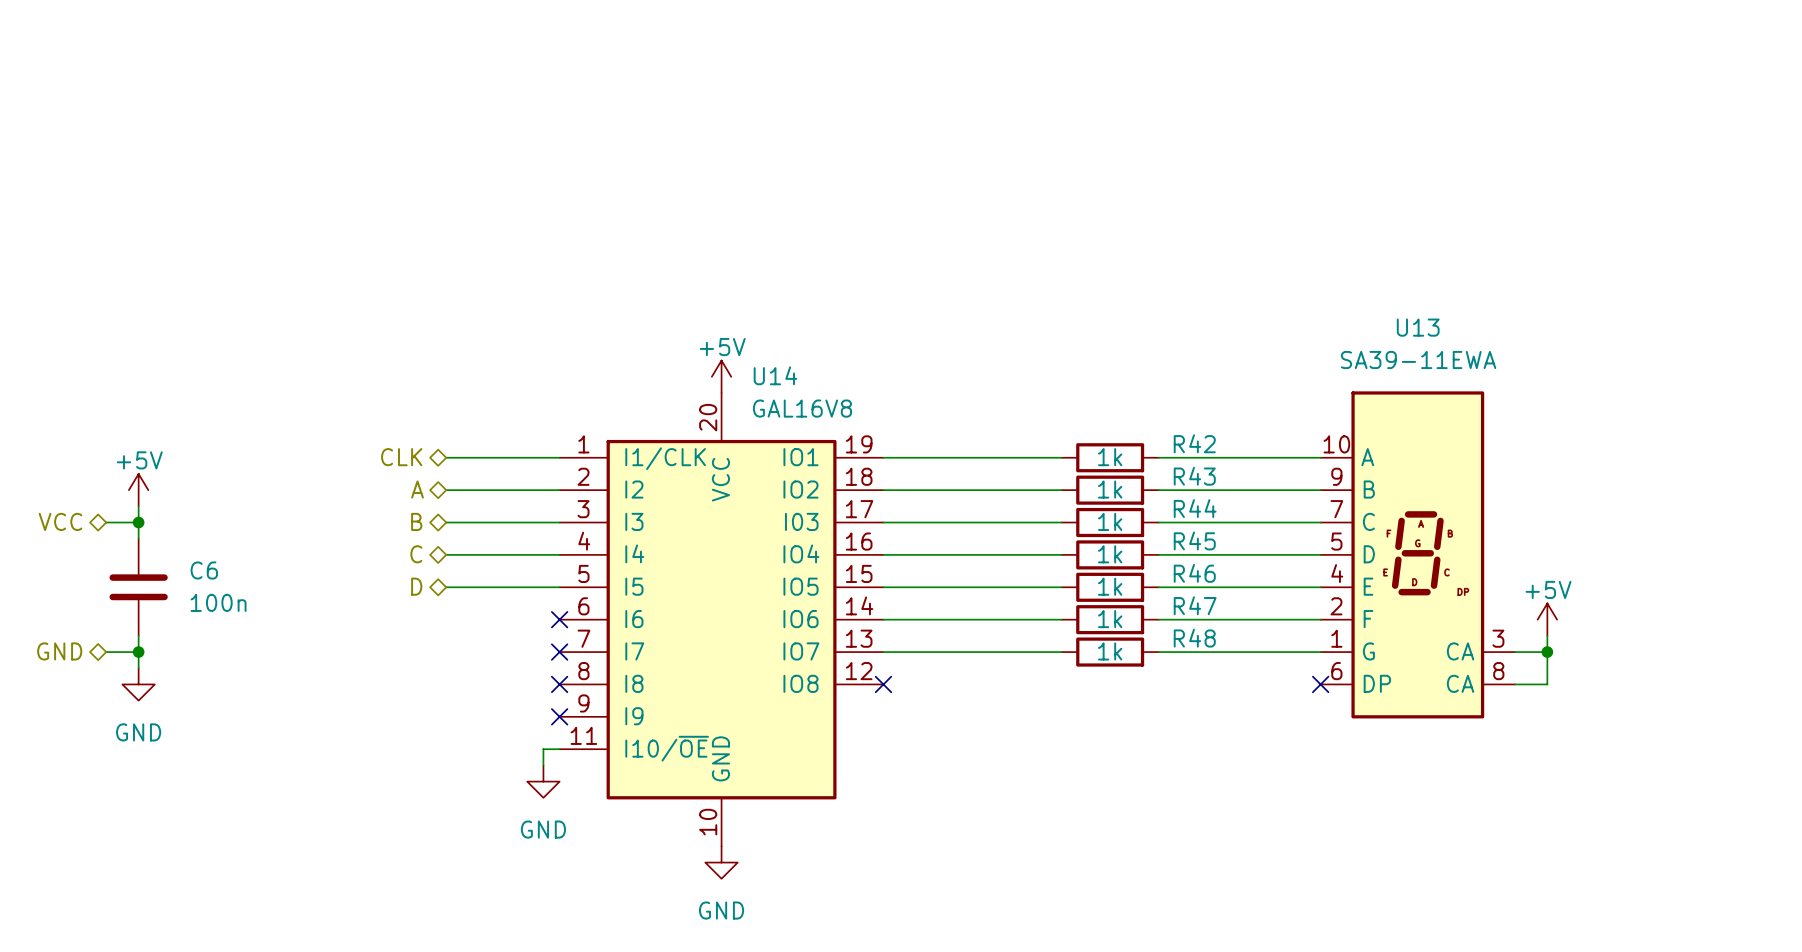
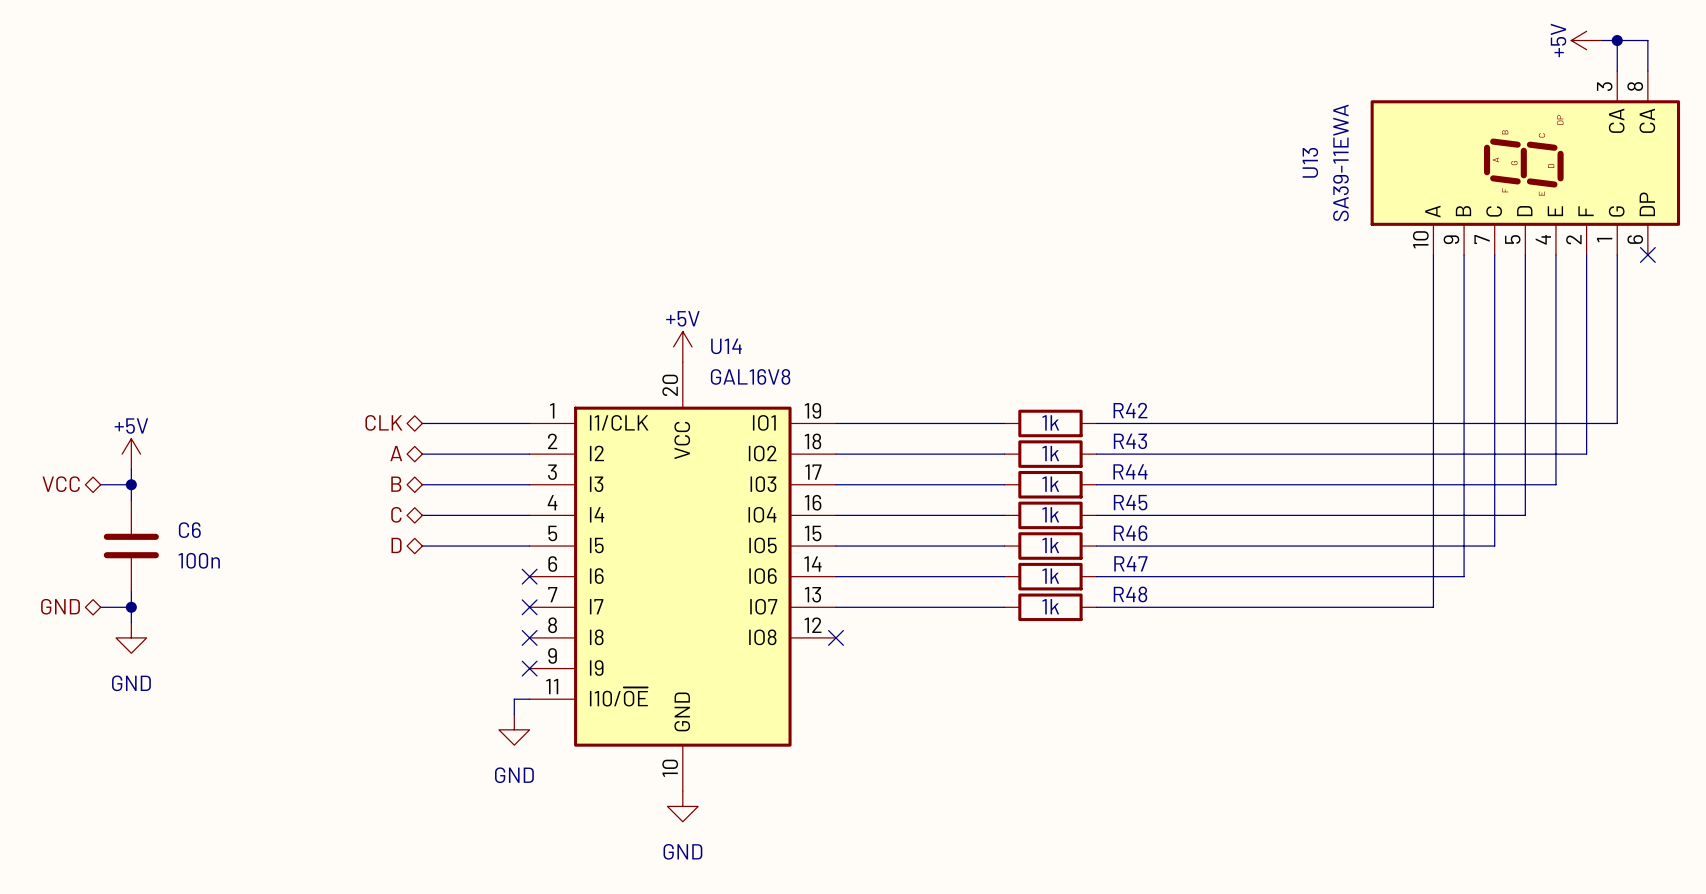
power symbol: none -> +5V (1586, 40)
wire: none -> (1601, 40) (1647, 40) (1647, 71)
wire: none -> (1617, 40) (1617, 71)
junction: none -> (1617, 40)
wire: none -> (1433, 254) (1433, 607) (1249, 607)
wire: none -> (1464, 254) (1464, 576) (1249, 576)
wire: none -> (1494, 254) (1494, 546) (1249, 546)
wire: none -> (1525, 254) (1525, 515) (1249, 515)
wire: none -> (1555, 254) (1555, 484) (1249, 484)
wire: none -> (1586, 254) (1586, 454) (1249, 454)
wire: none -> (1617, 254) (1617, 423) (1249, 423)
no-connect mark: none -> (1647, 254)
U13 rotation: 0° (1417, 554) -> 90° counterclockwise (1525, 163)
U13 position: (1417, 554) -> (1525, 163)
power symbol: +5V (1547, 619) -> none
wire: (1547, 635) (1547, 684) (1514, 684) -> none
wire: (1514, 652) (1547, 652) -> none
junction: (1547, 652) -> none
no-connect mark: (1320, 684) -> none

